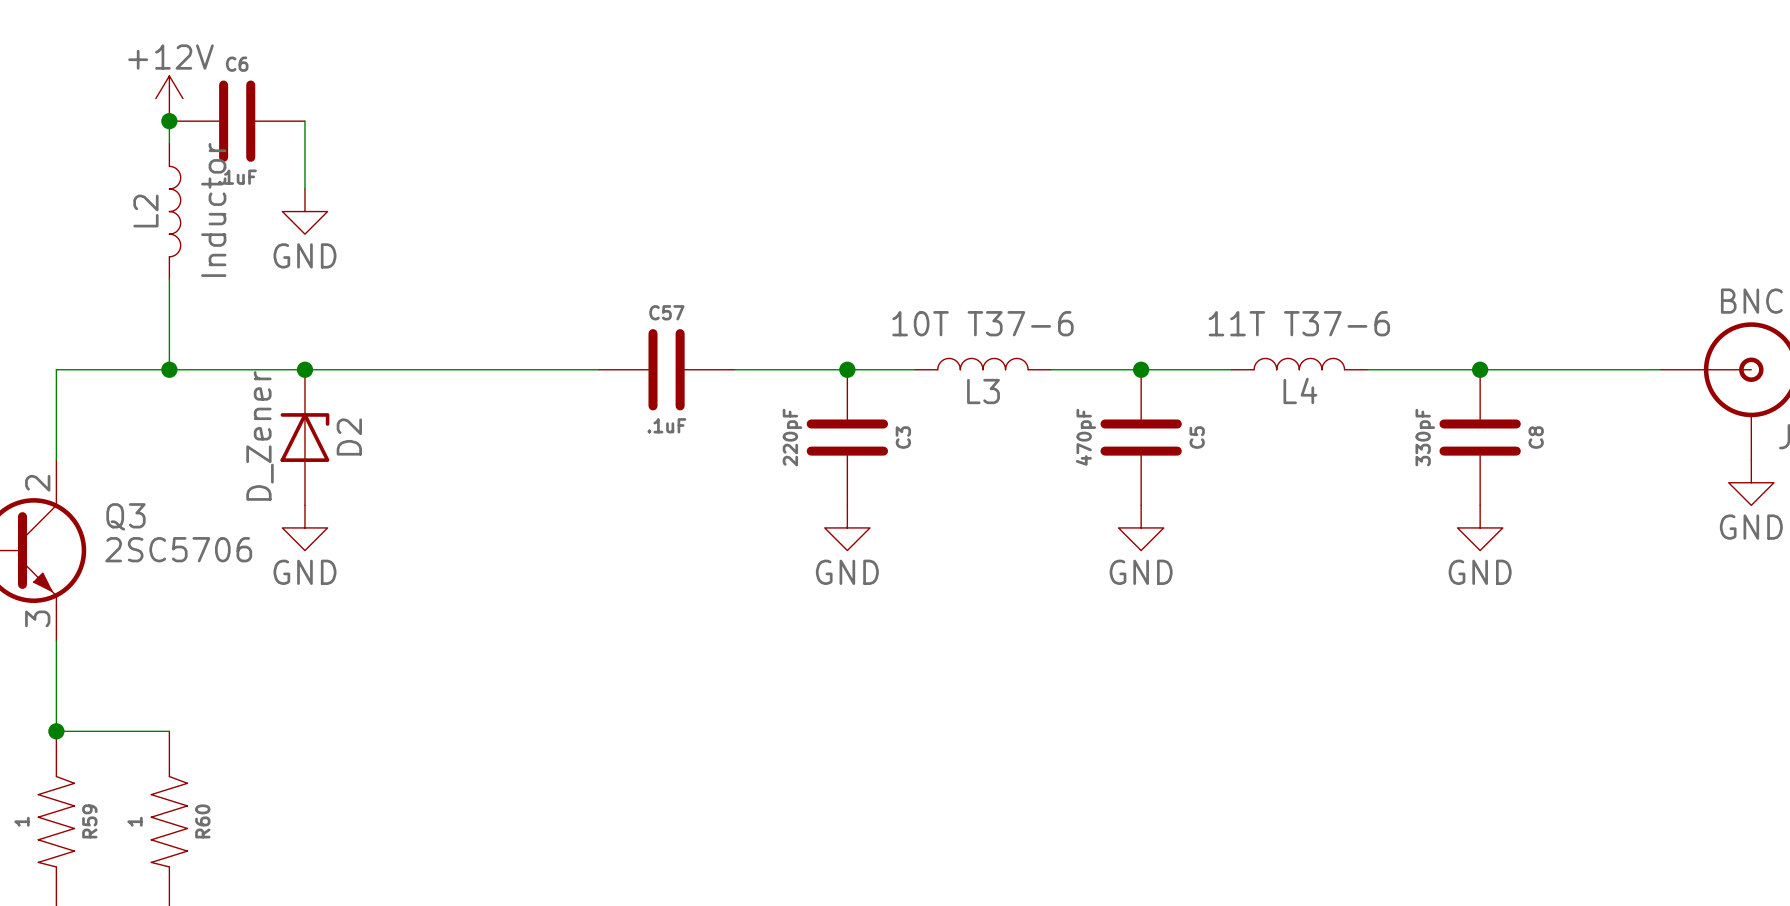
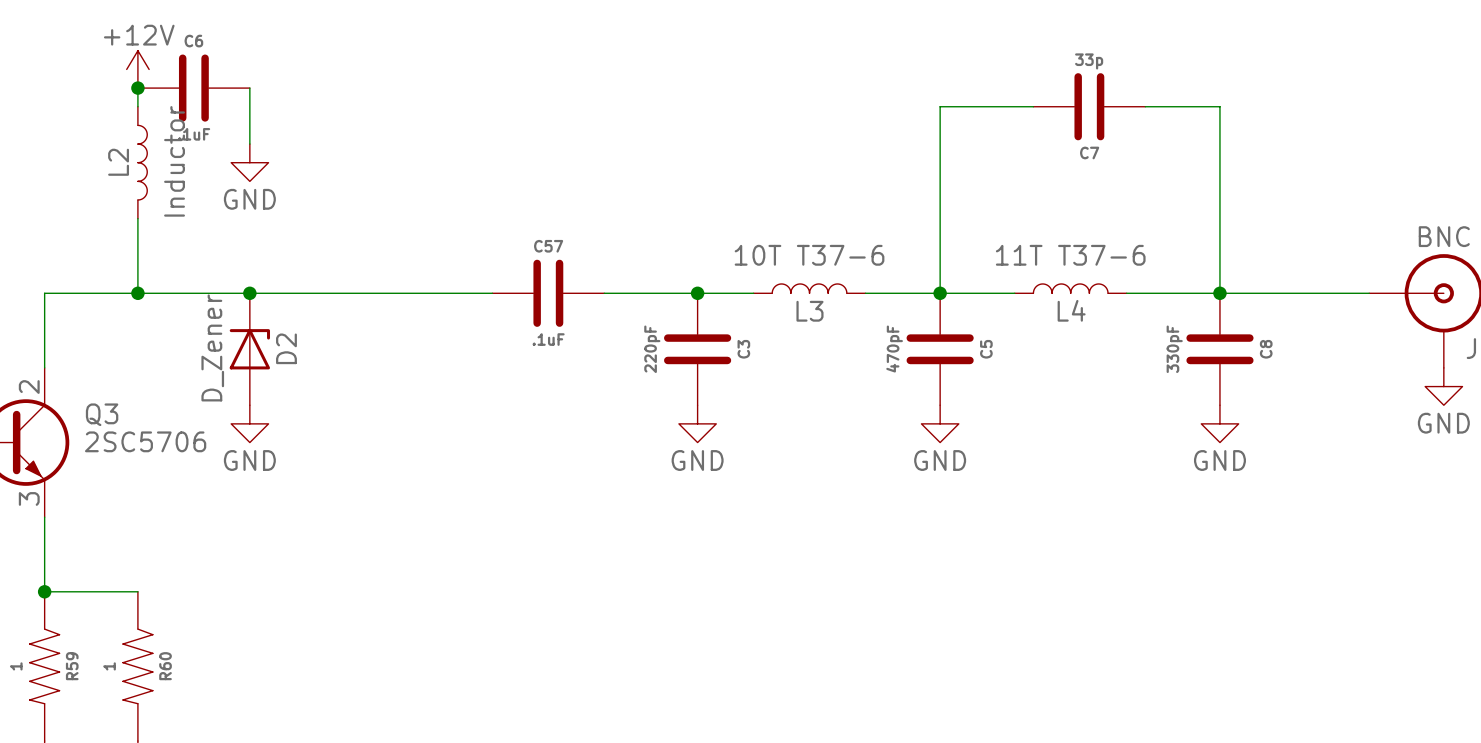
wire: none -> (1033, 106) (940, 106) (940, 293)
C7: none -> 33p (1089, 106)
wire: none -> (1145, 106) (1219, 106) (1219, 293)

